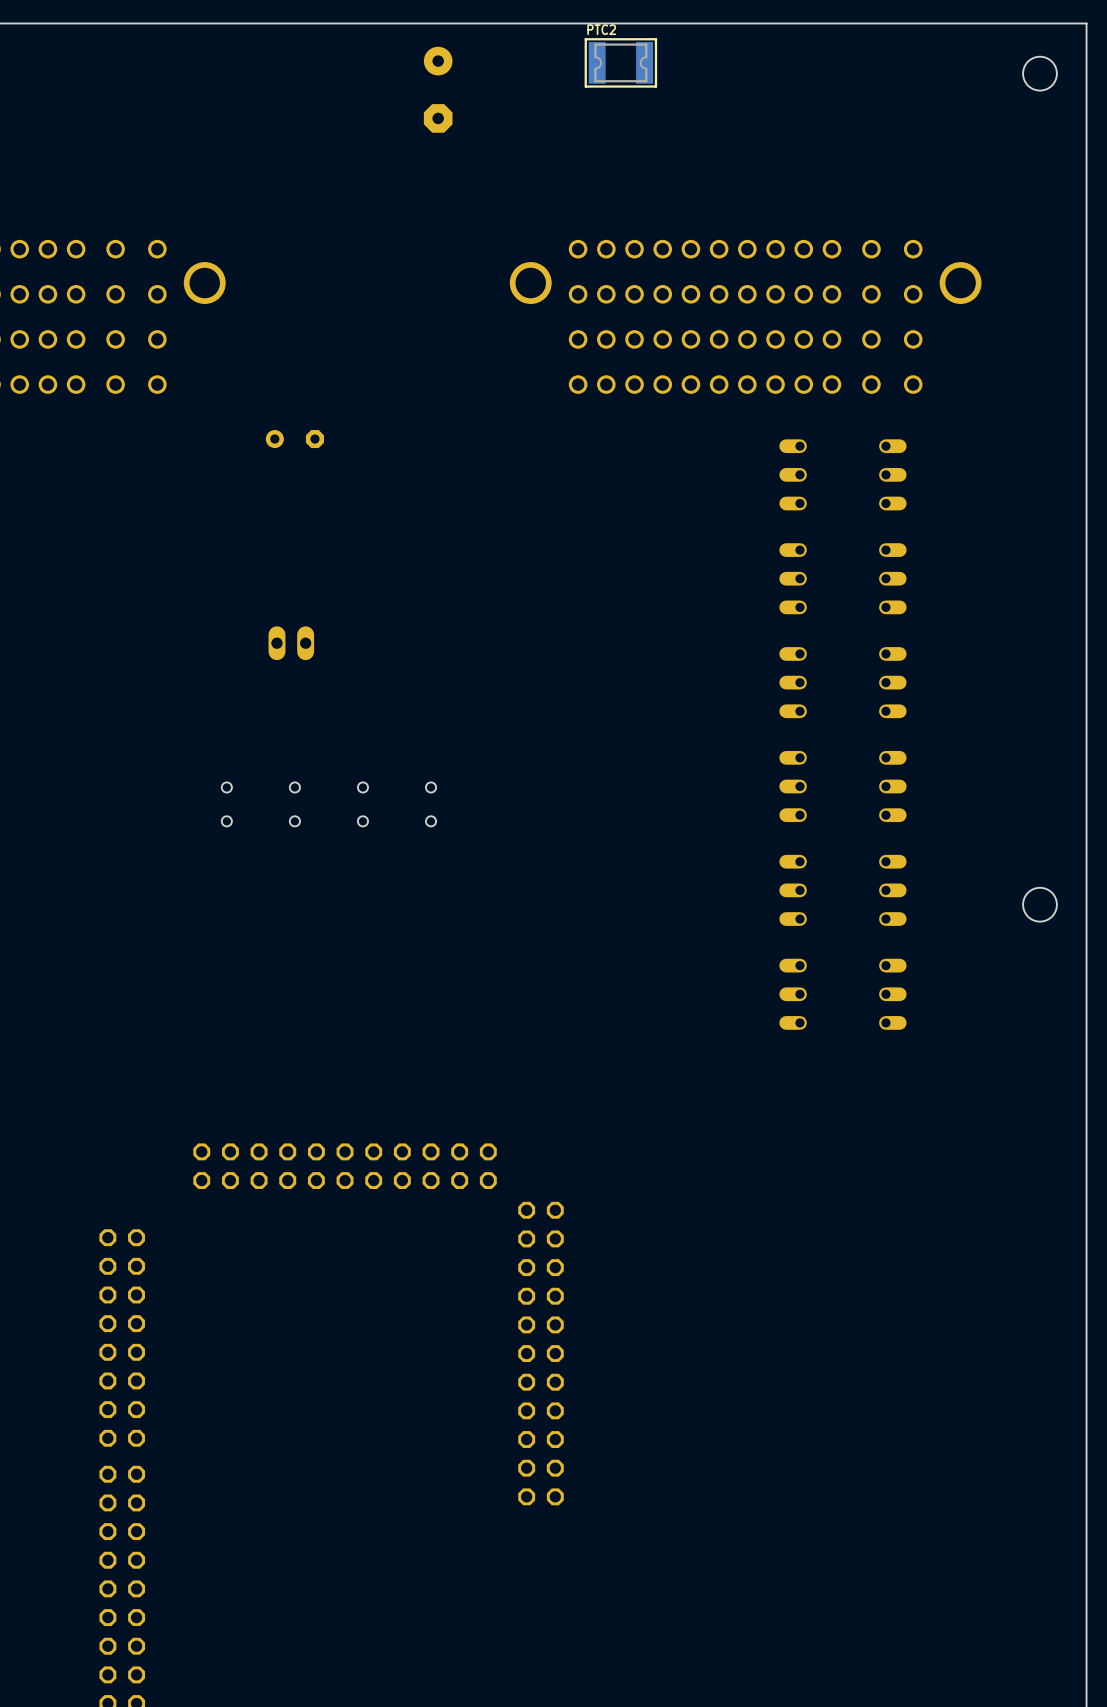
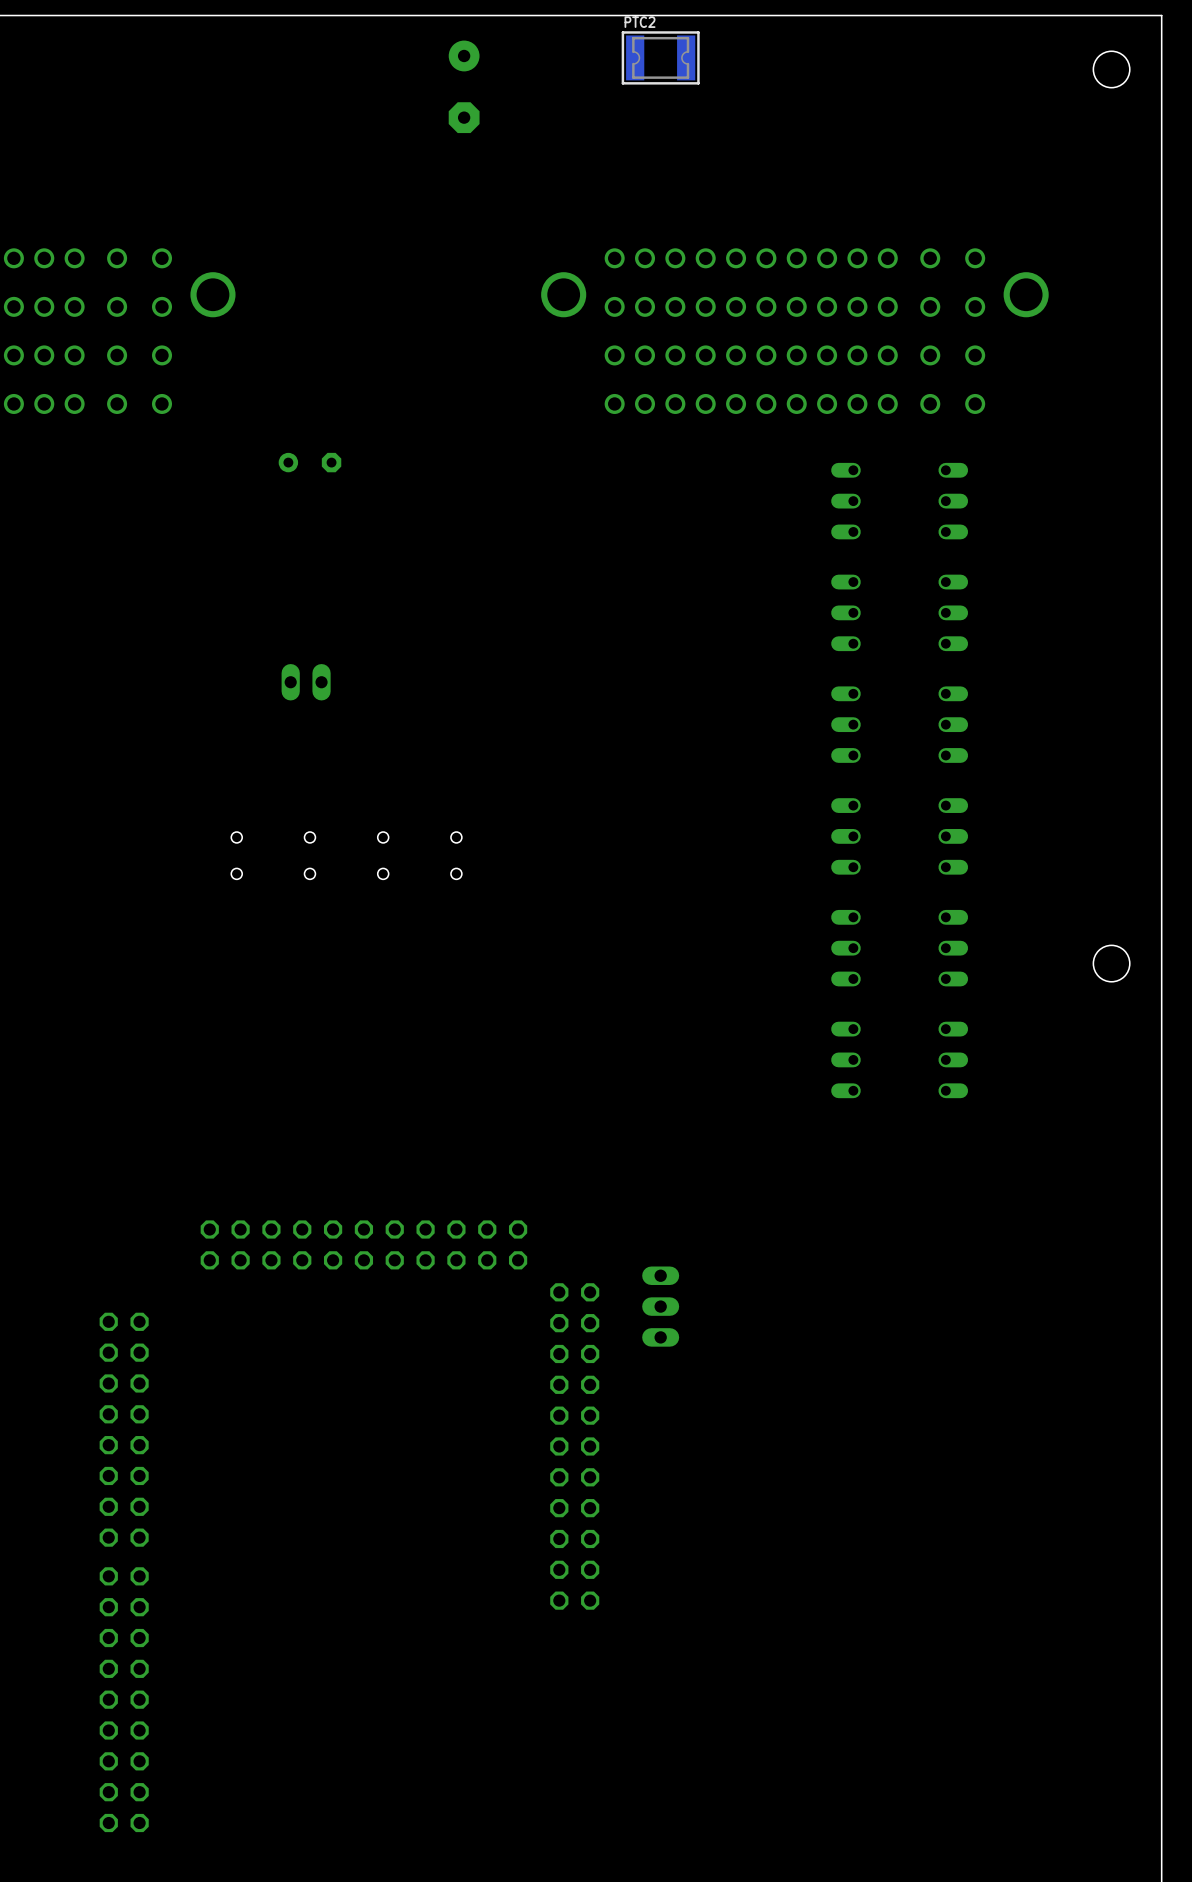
part: none -> (660, 1306)

